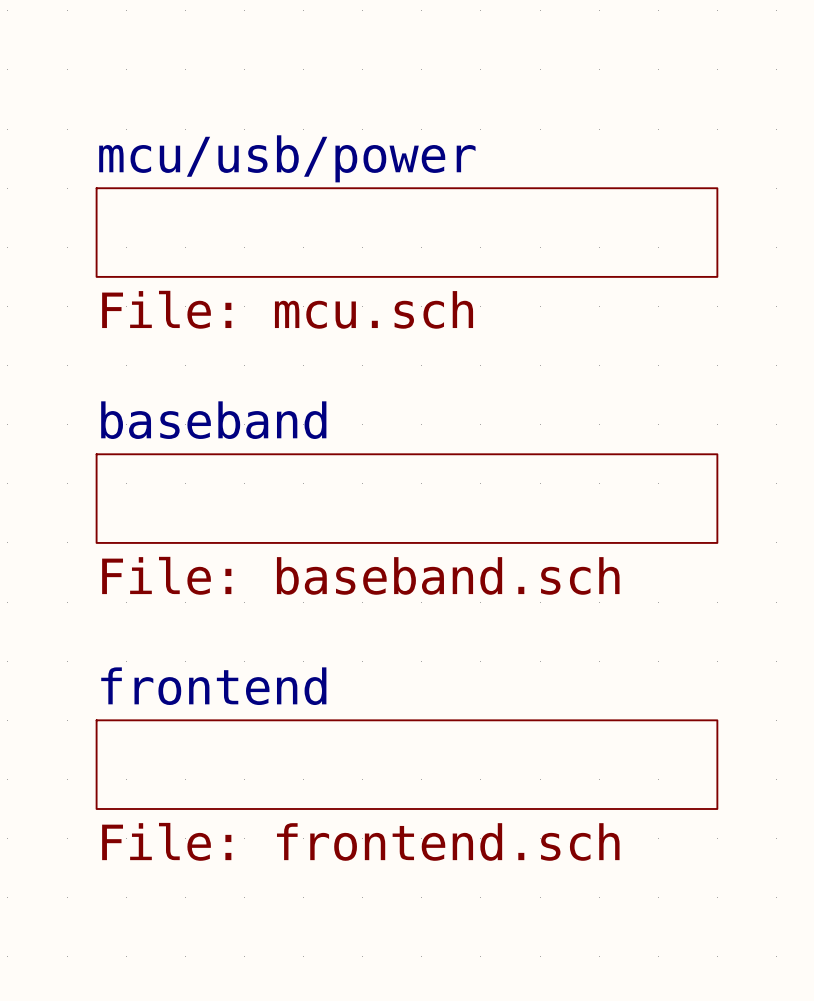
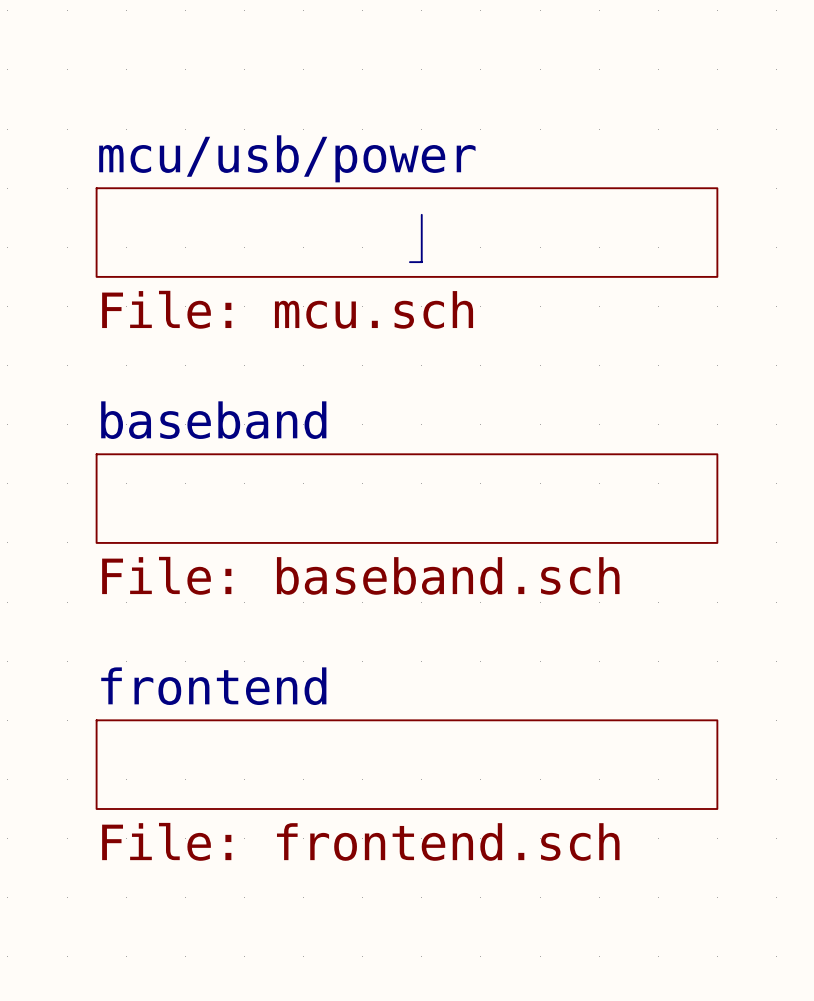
wire: none -> (421, 214) (421, 262) (409, 262)

